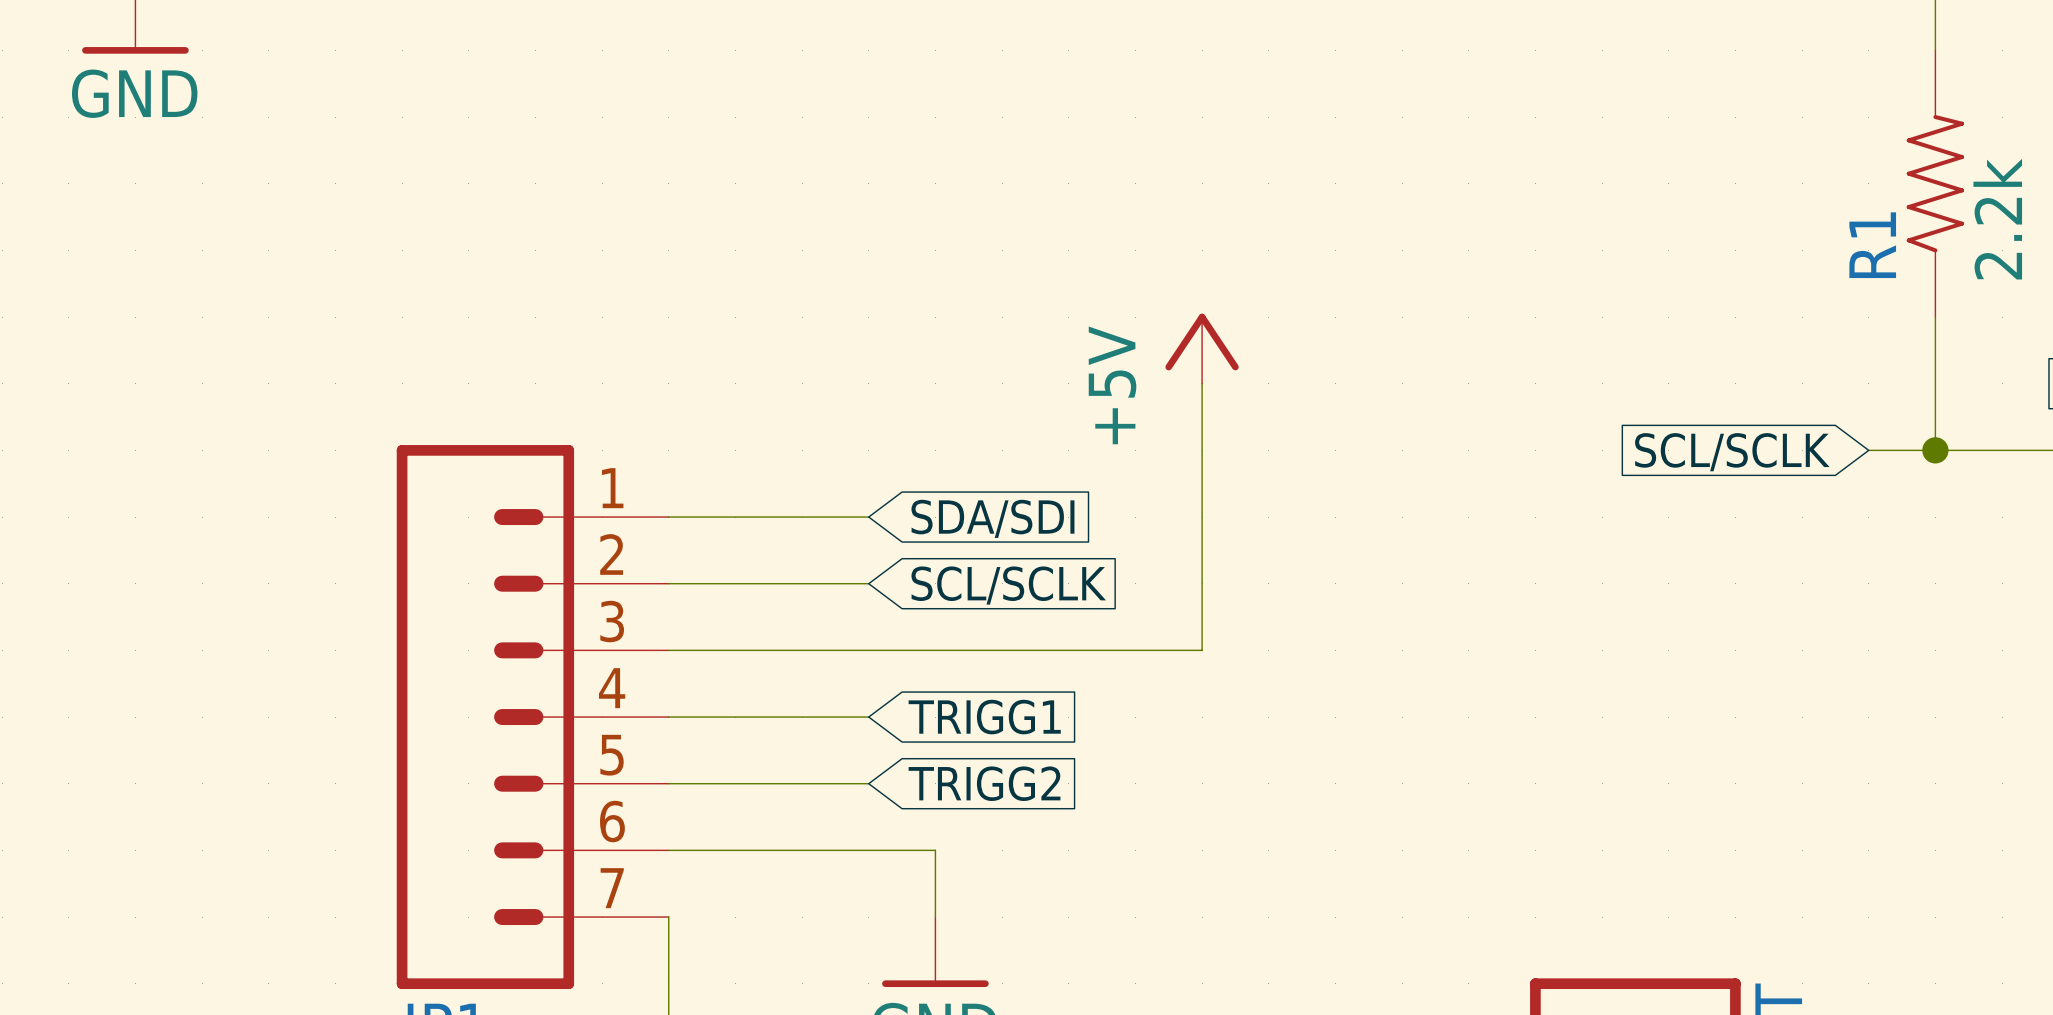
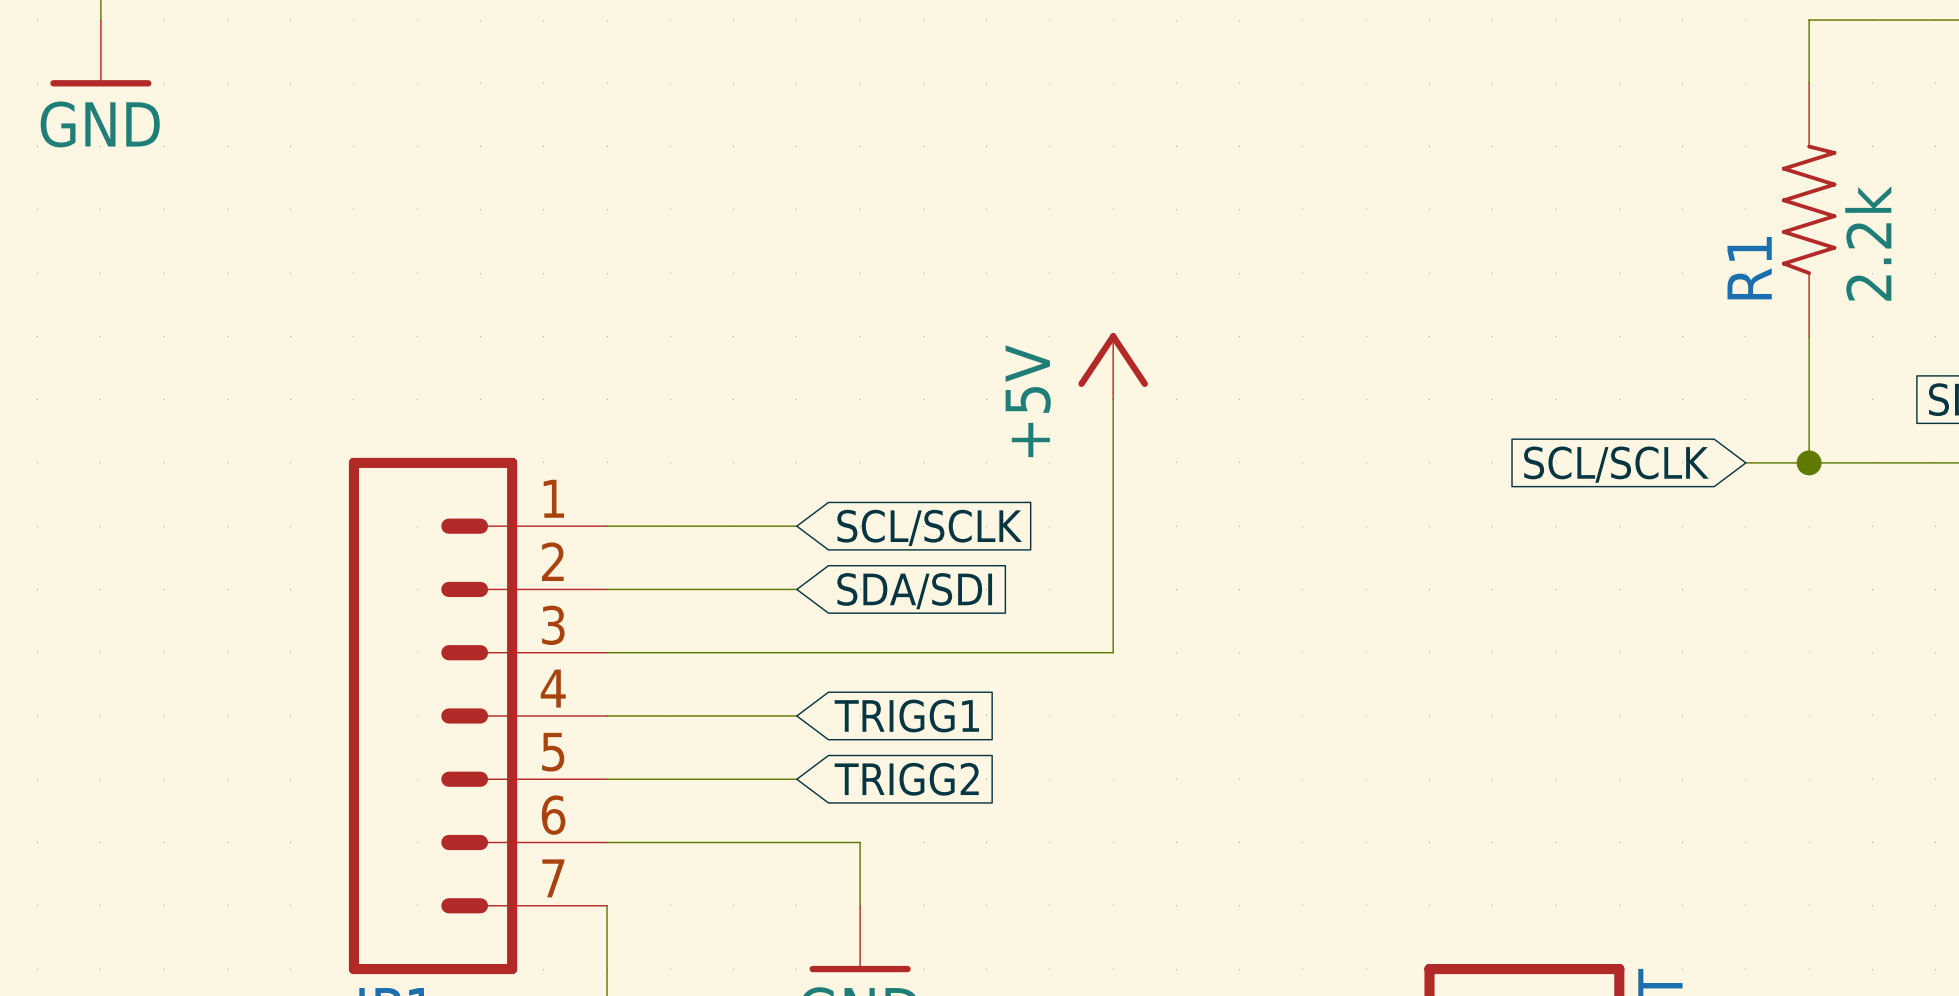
global label: SDA/SDI (992, 518) -> SCL/SCLK (929, 527)
global label: SCL/SCLK (1008, 585) -> SDA/SDI (914, 591)

